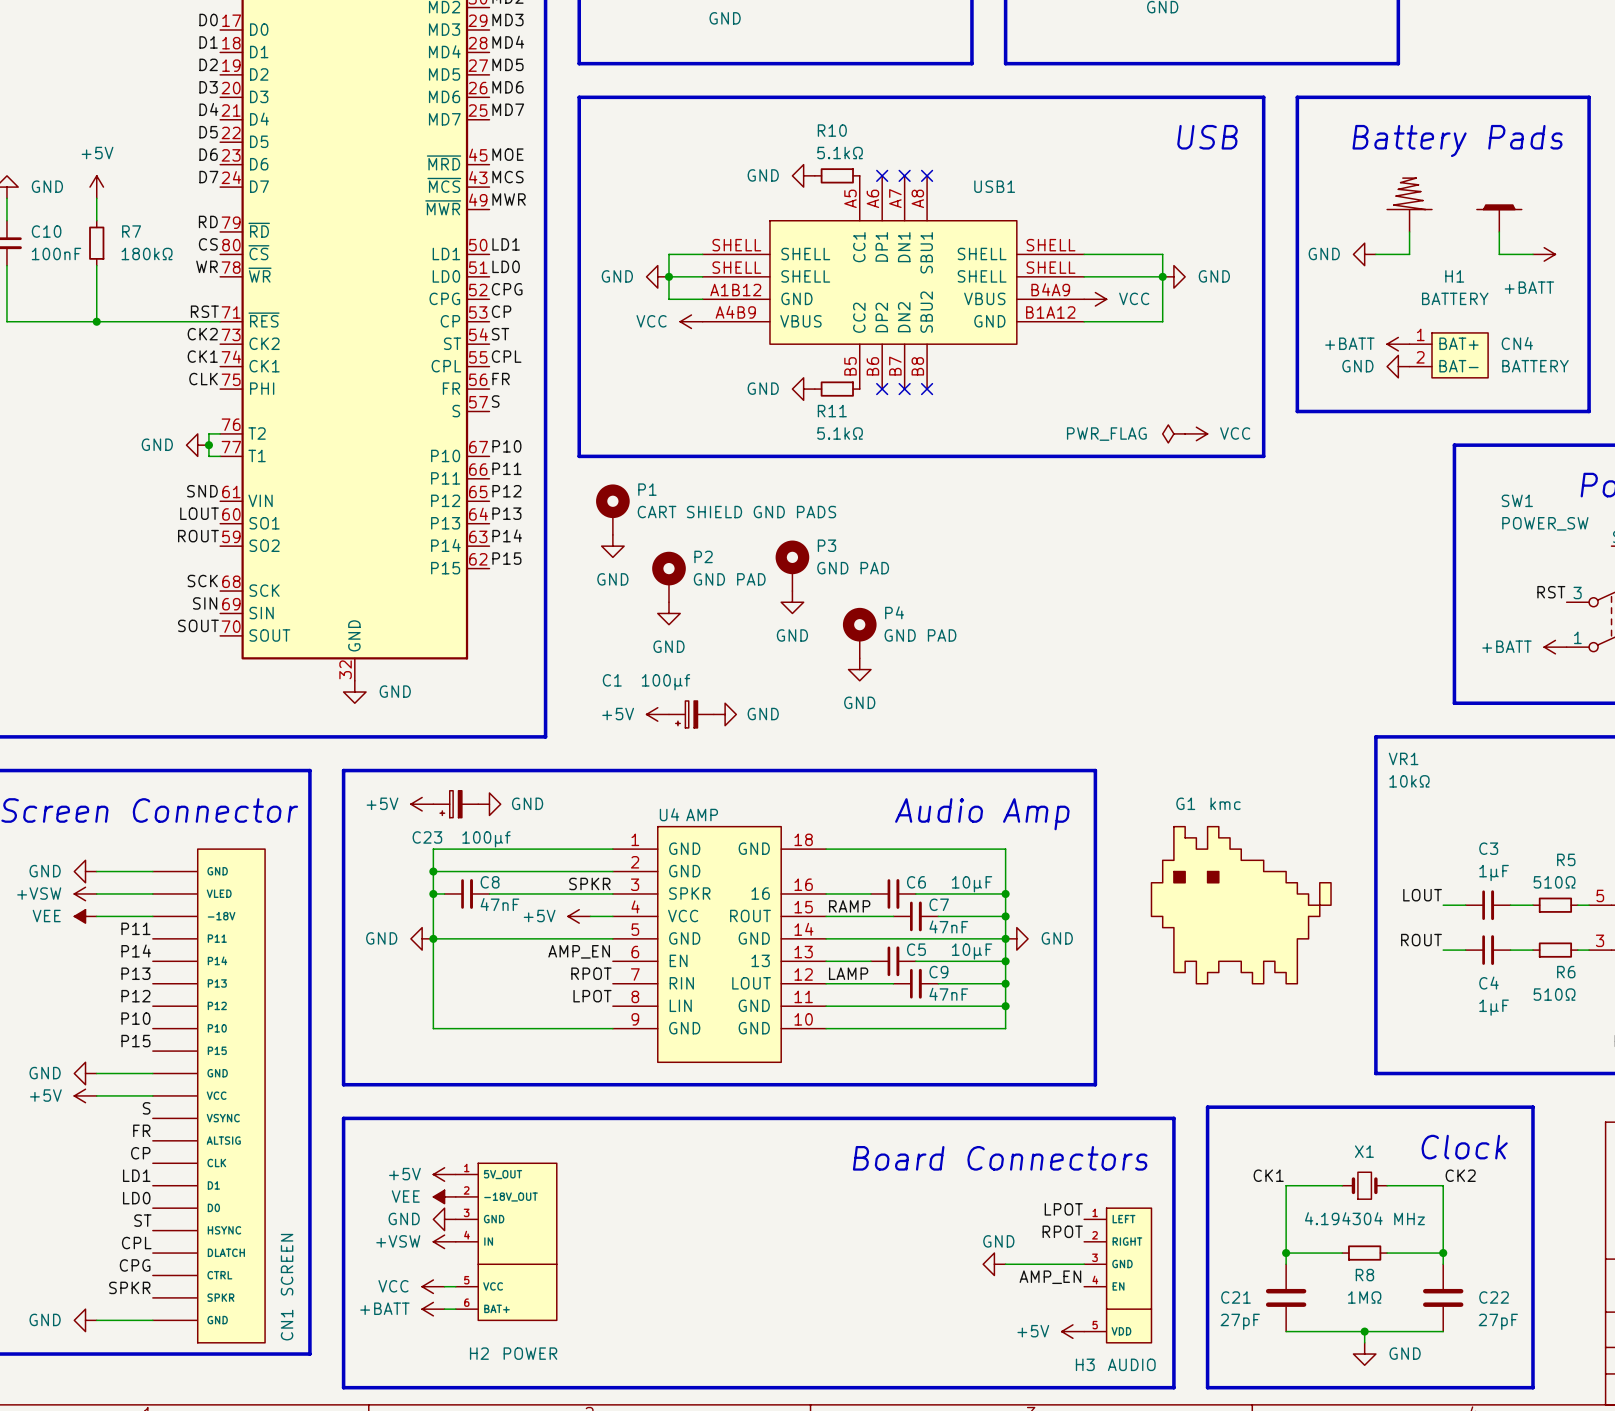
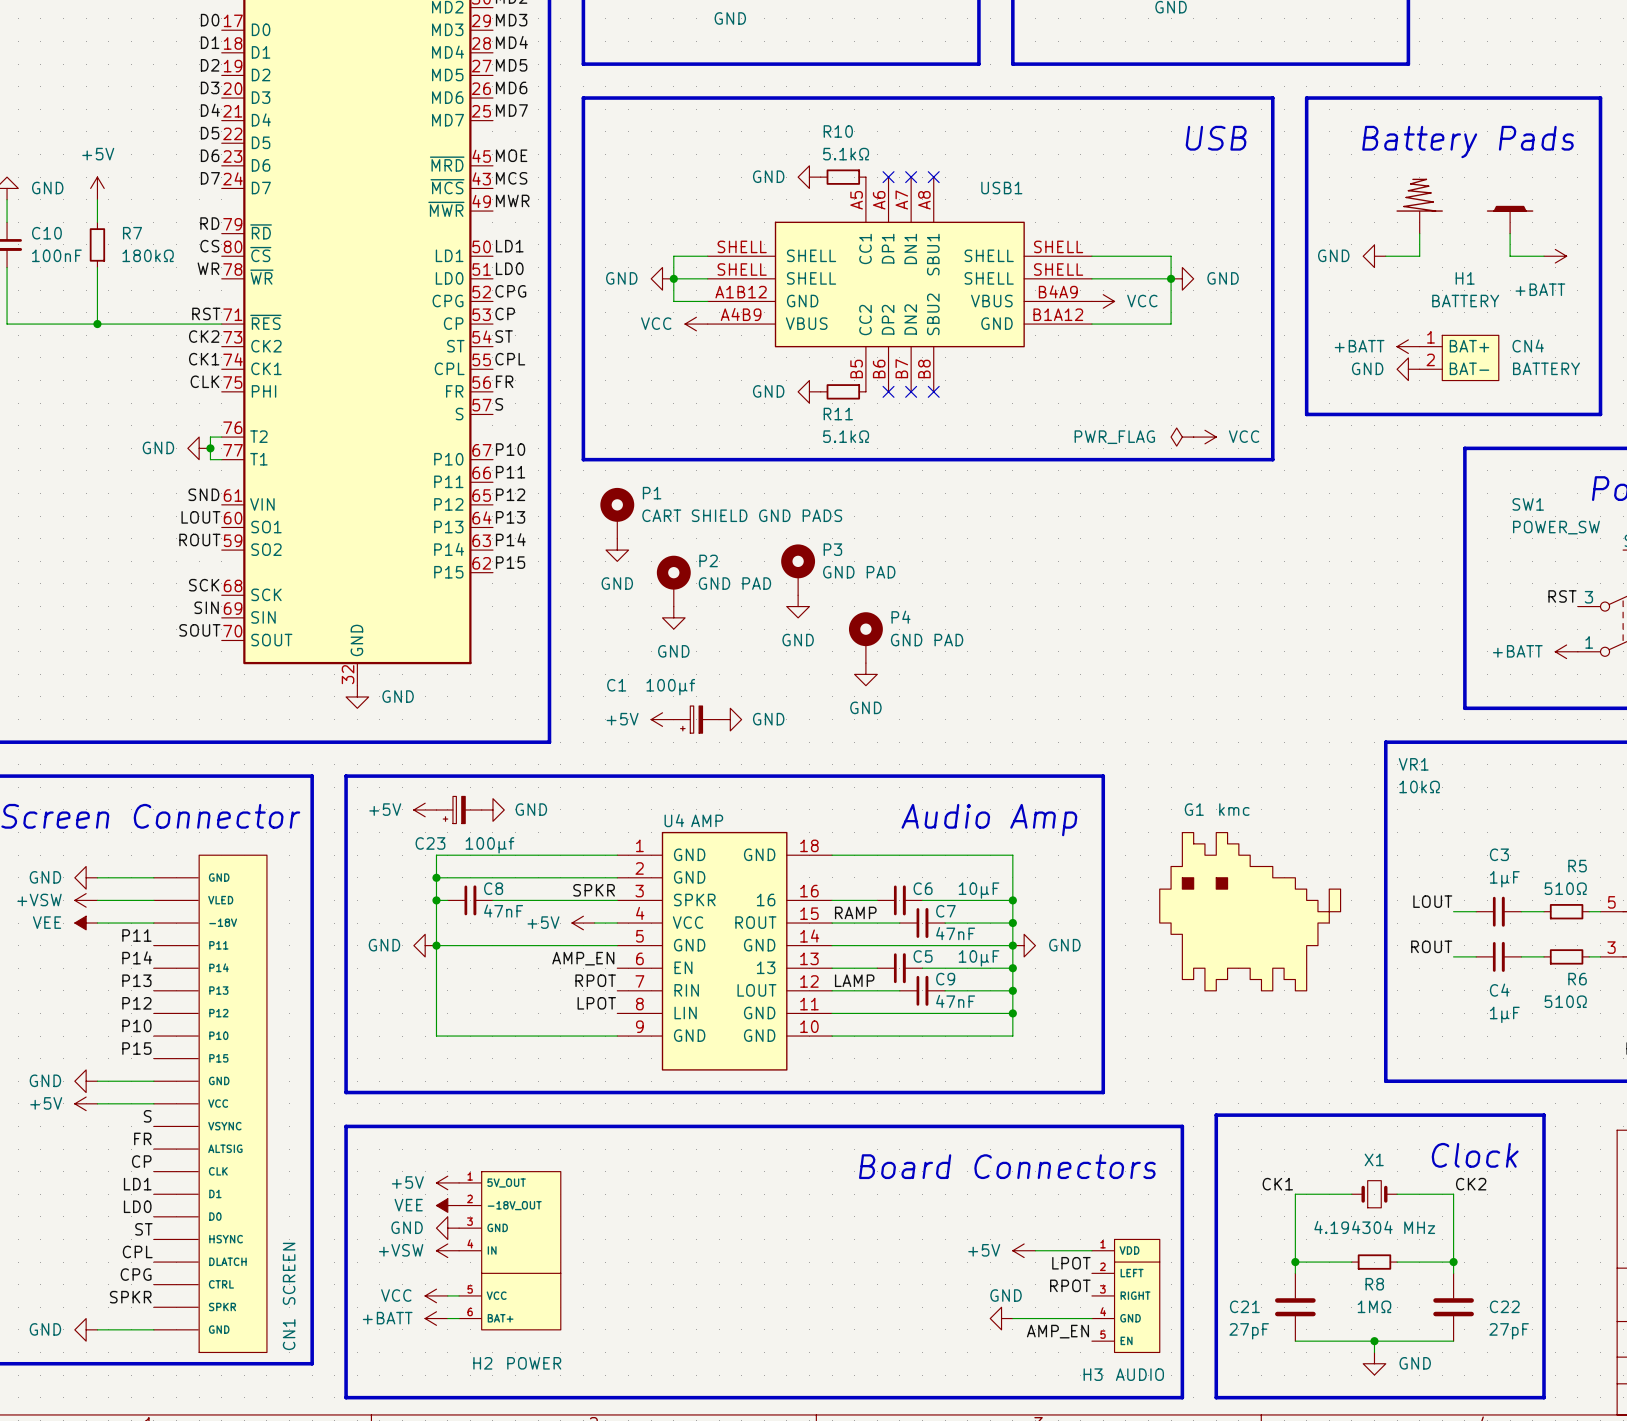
H3 symbol: [1084, 1196, 1152, 1343] -> [1091, 1212, 1160, 1353]
label position: LPOT (1063, 1209) -> LPOT (1071, 1263)
label: RPOT (1062, 1231) -> none
wire: none -> (1035, 1250) (1091, 1250)
power symbol position: GND (994, 1264) -> GND (1001, 1318)
wire: (1005, 1264) (1084, 1264) -> (1012, 1318) (1091, 1318)
label: AMP_EN (1050, 1277) -> RPOT (1070, 1285)
label: none -> AMP_EN (1057, 1331)
power symbol position: +5V (1072, 1331) -> +5V (1024, 1250)

